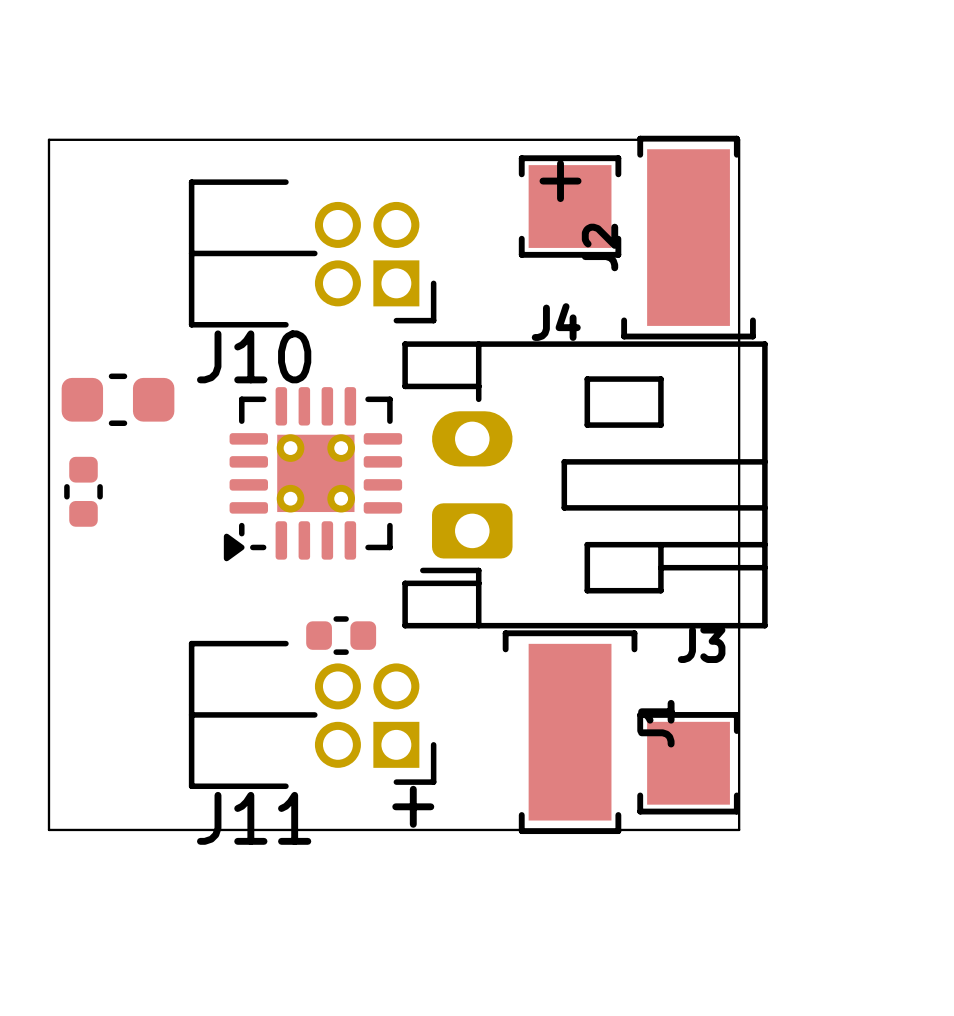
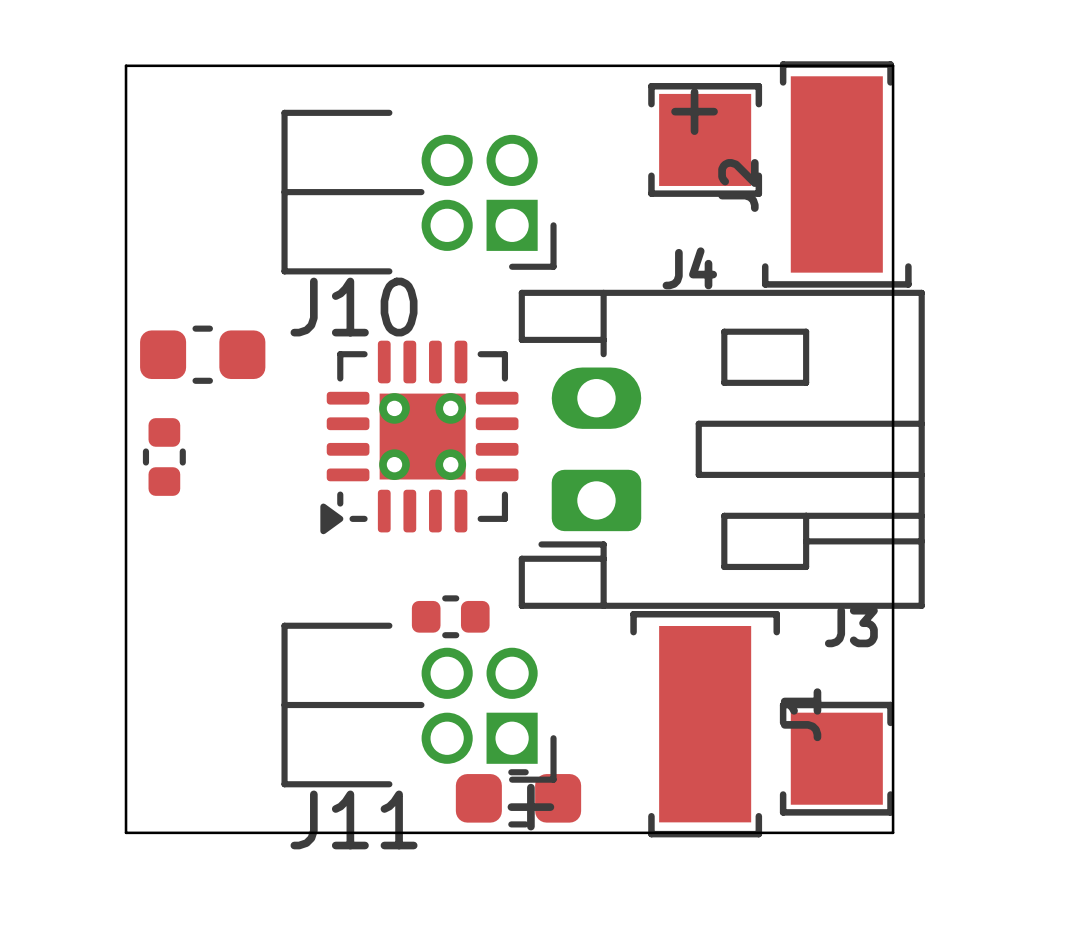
part: none -> (518, 798)

